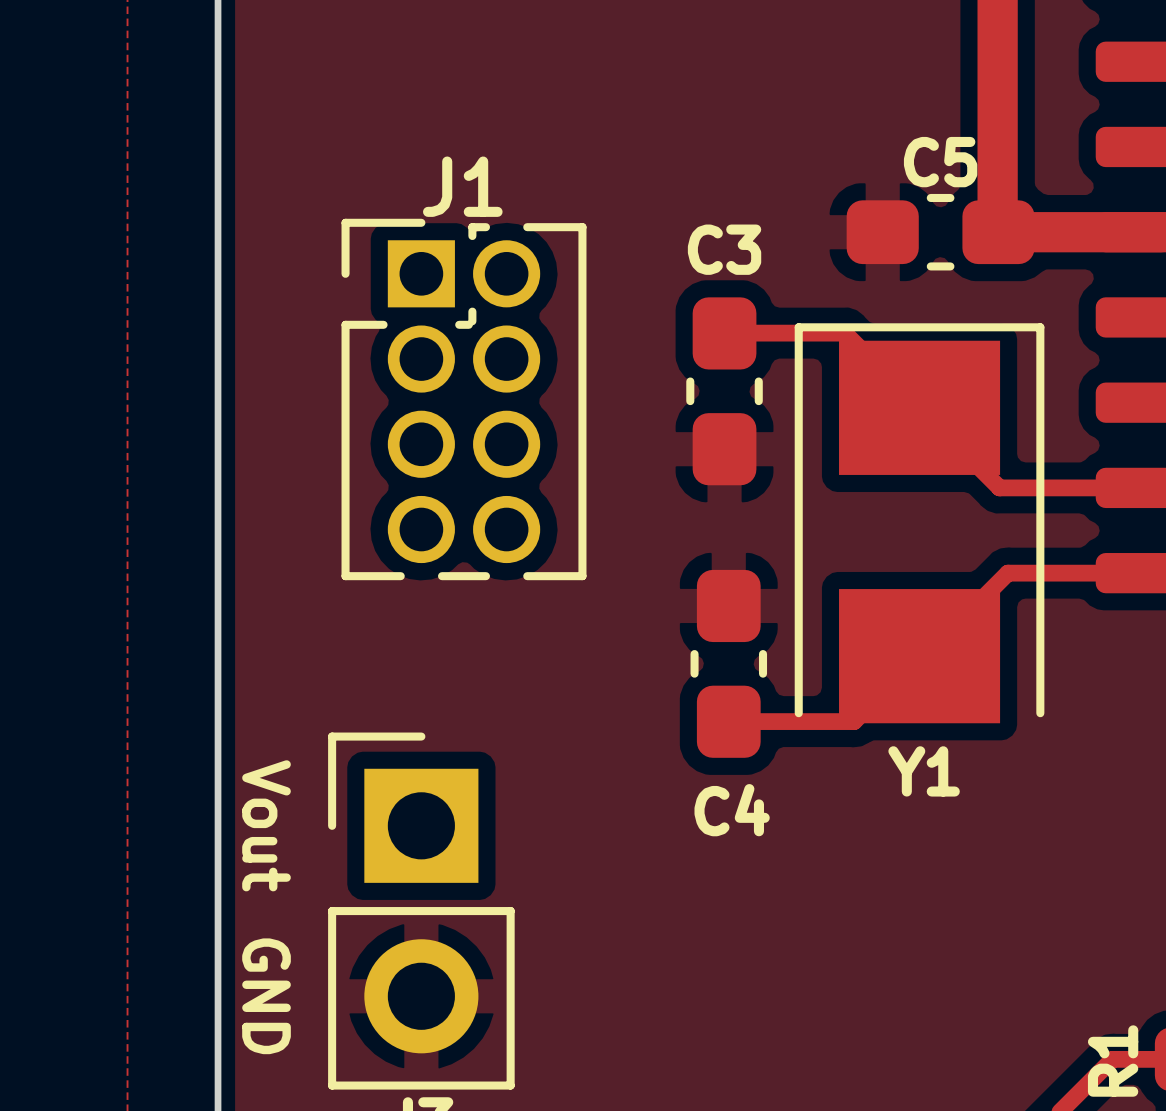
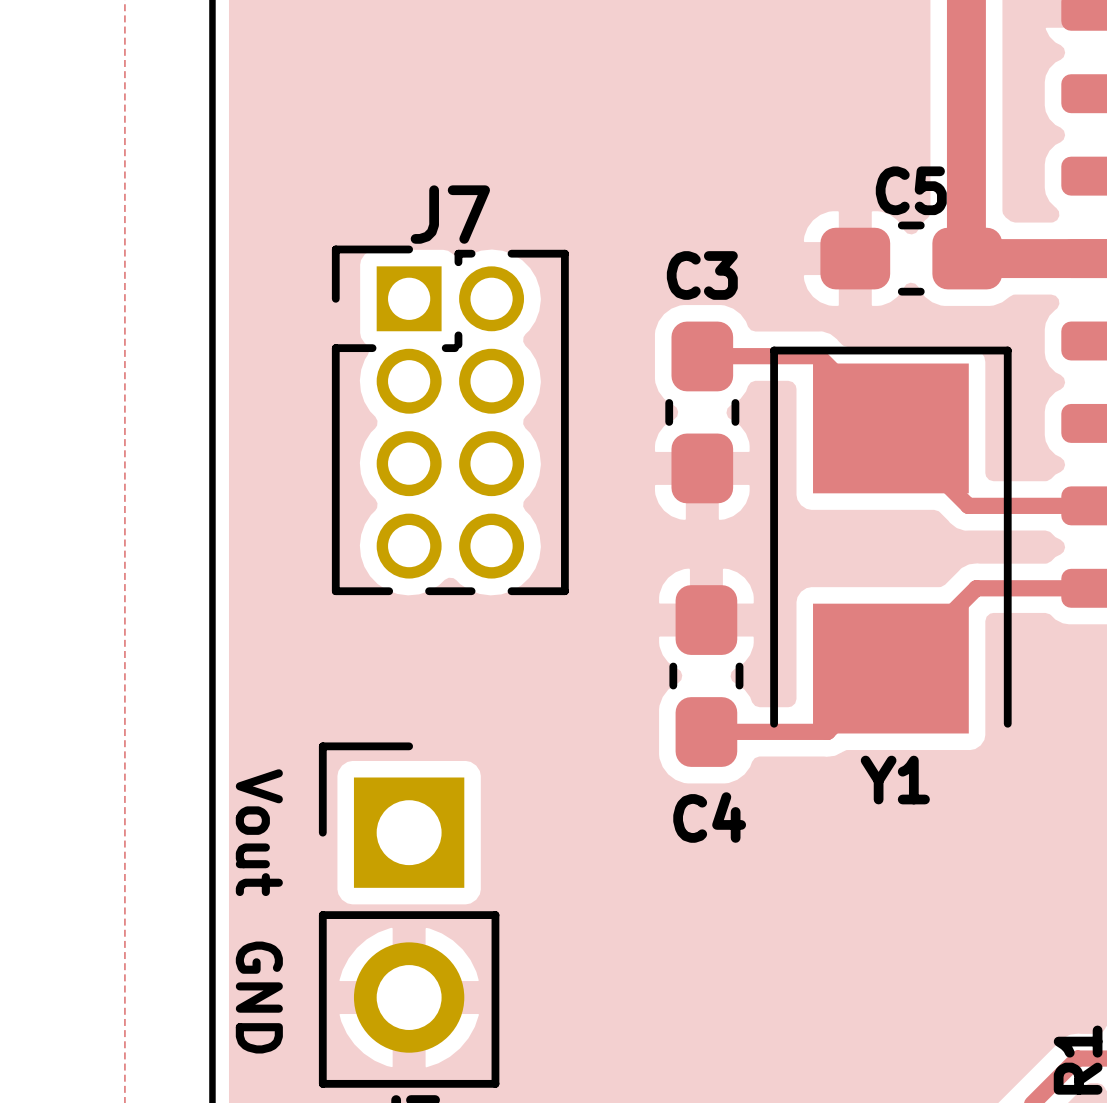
J1 name: J1 (462, 186) -> J7 (450, 214)

